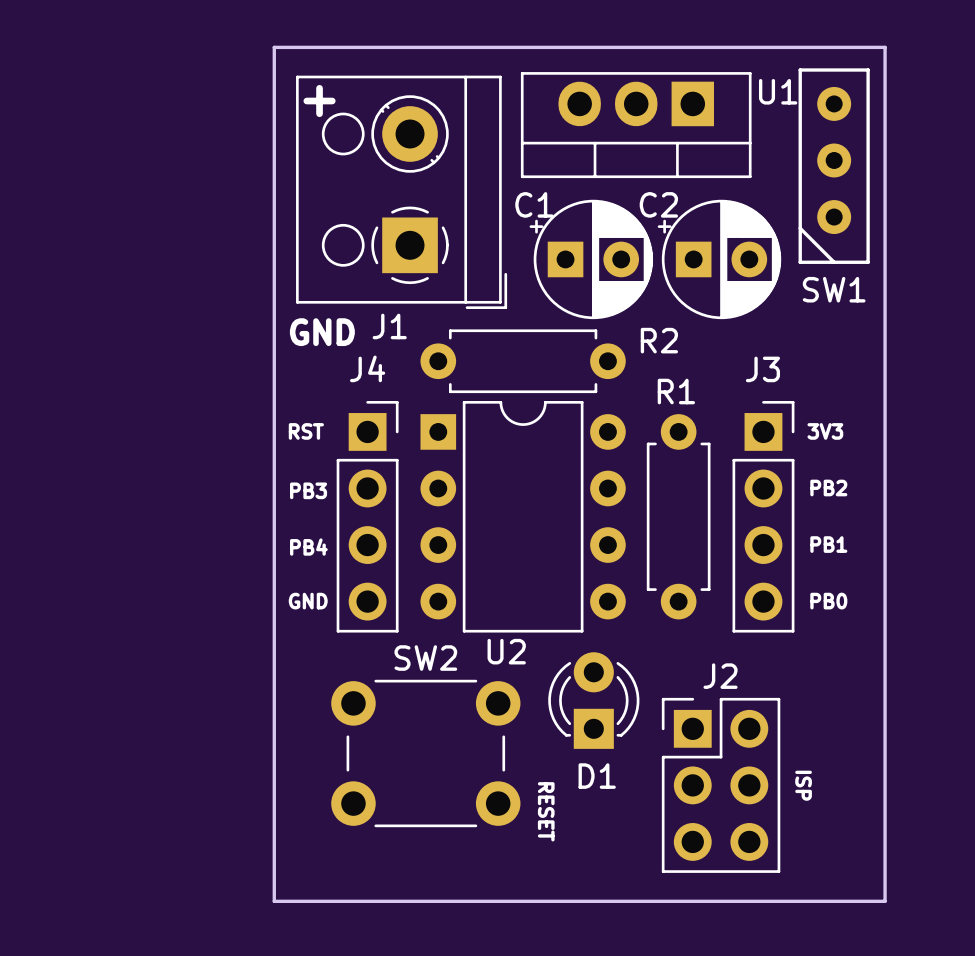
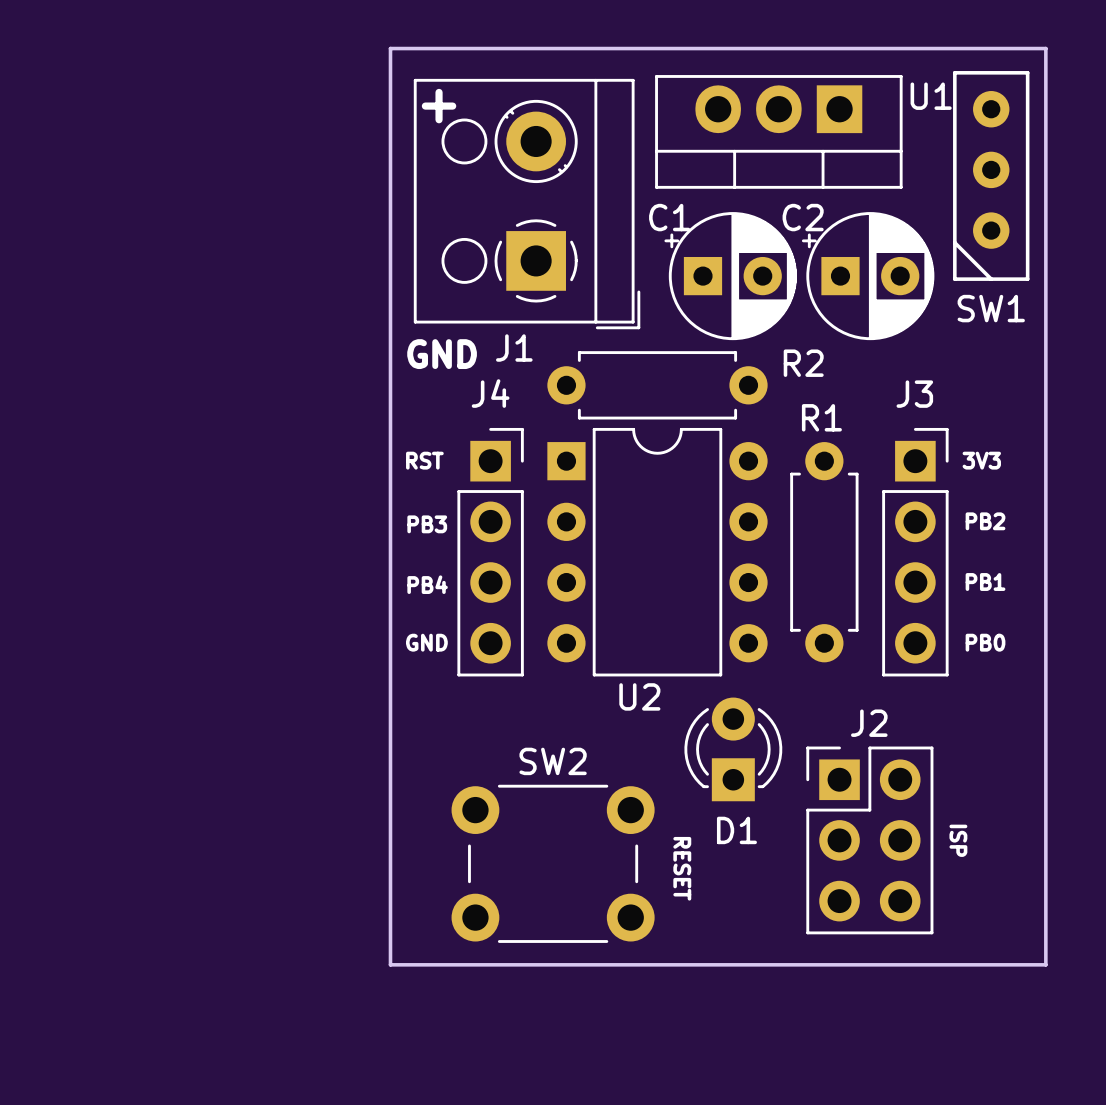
SW2 position: (425, 753) -> (553, 863)

